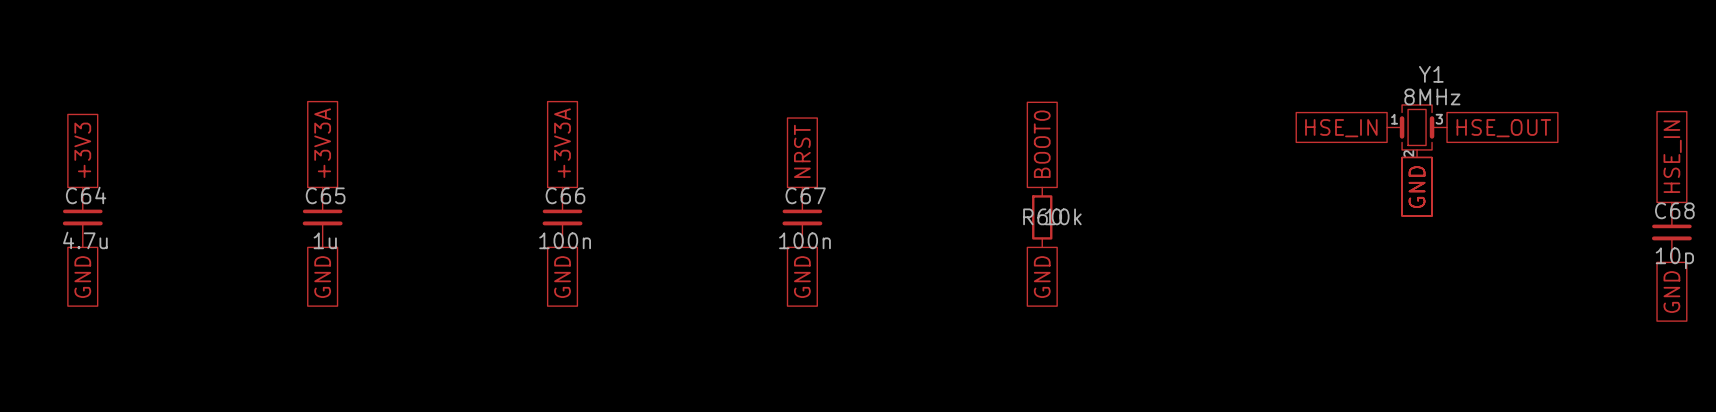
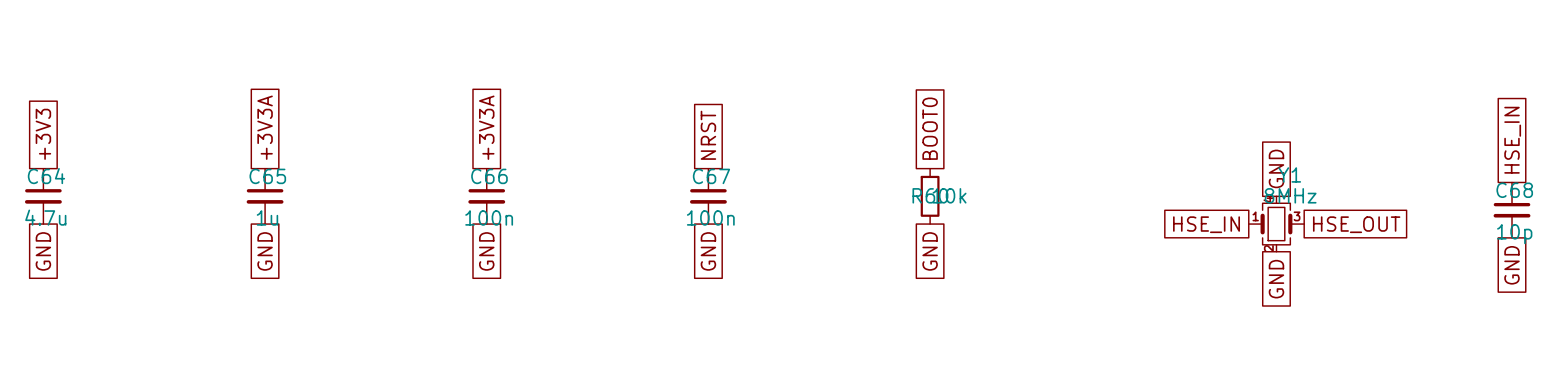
Y1 symbol: [1387, 104, 1448, 158] -> [1248, 196, 1305, 252]
global label position: HSE_IN (1341, 128) -> HSE_IN (1206, 224)
global label position: HSE_OUT (1503, 128) -> HSE_OUT (1356, 224)
global label rotation: 0° (1417, 187) -> 180° (1276, 168)
global label: none -> GND (1276, 279)

